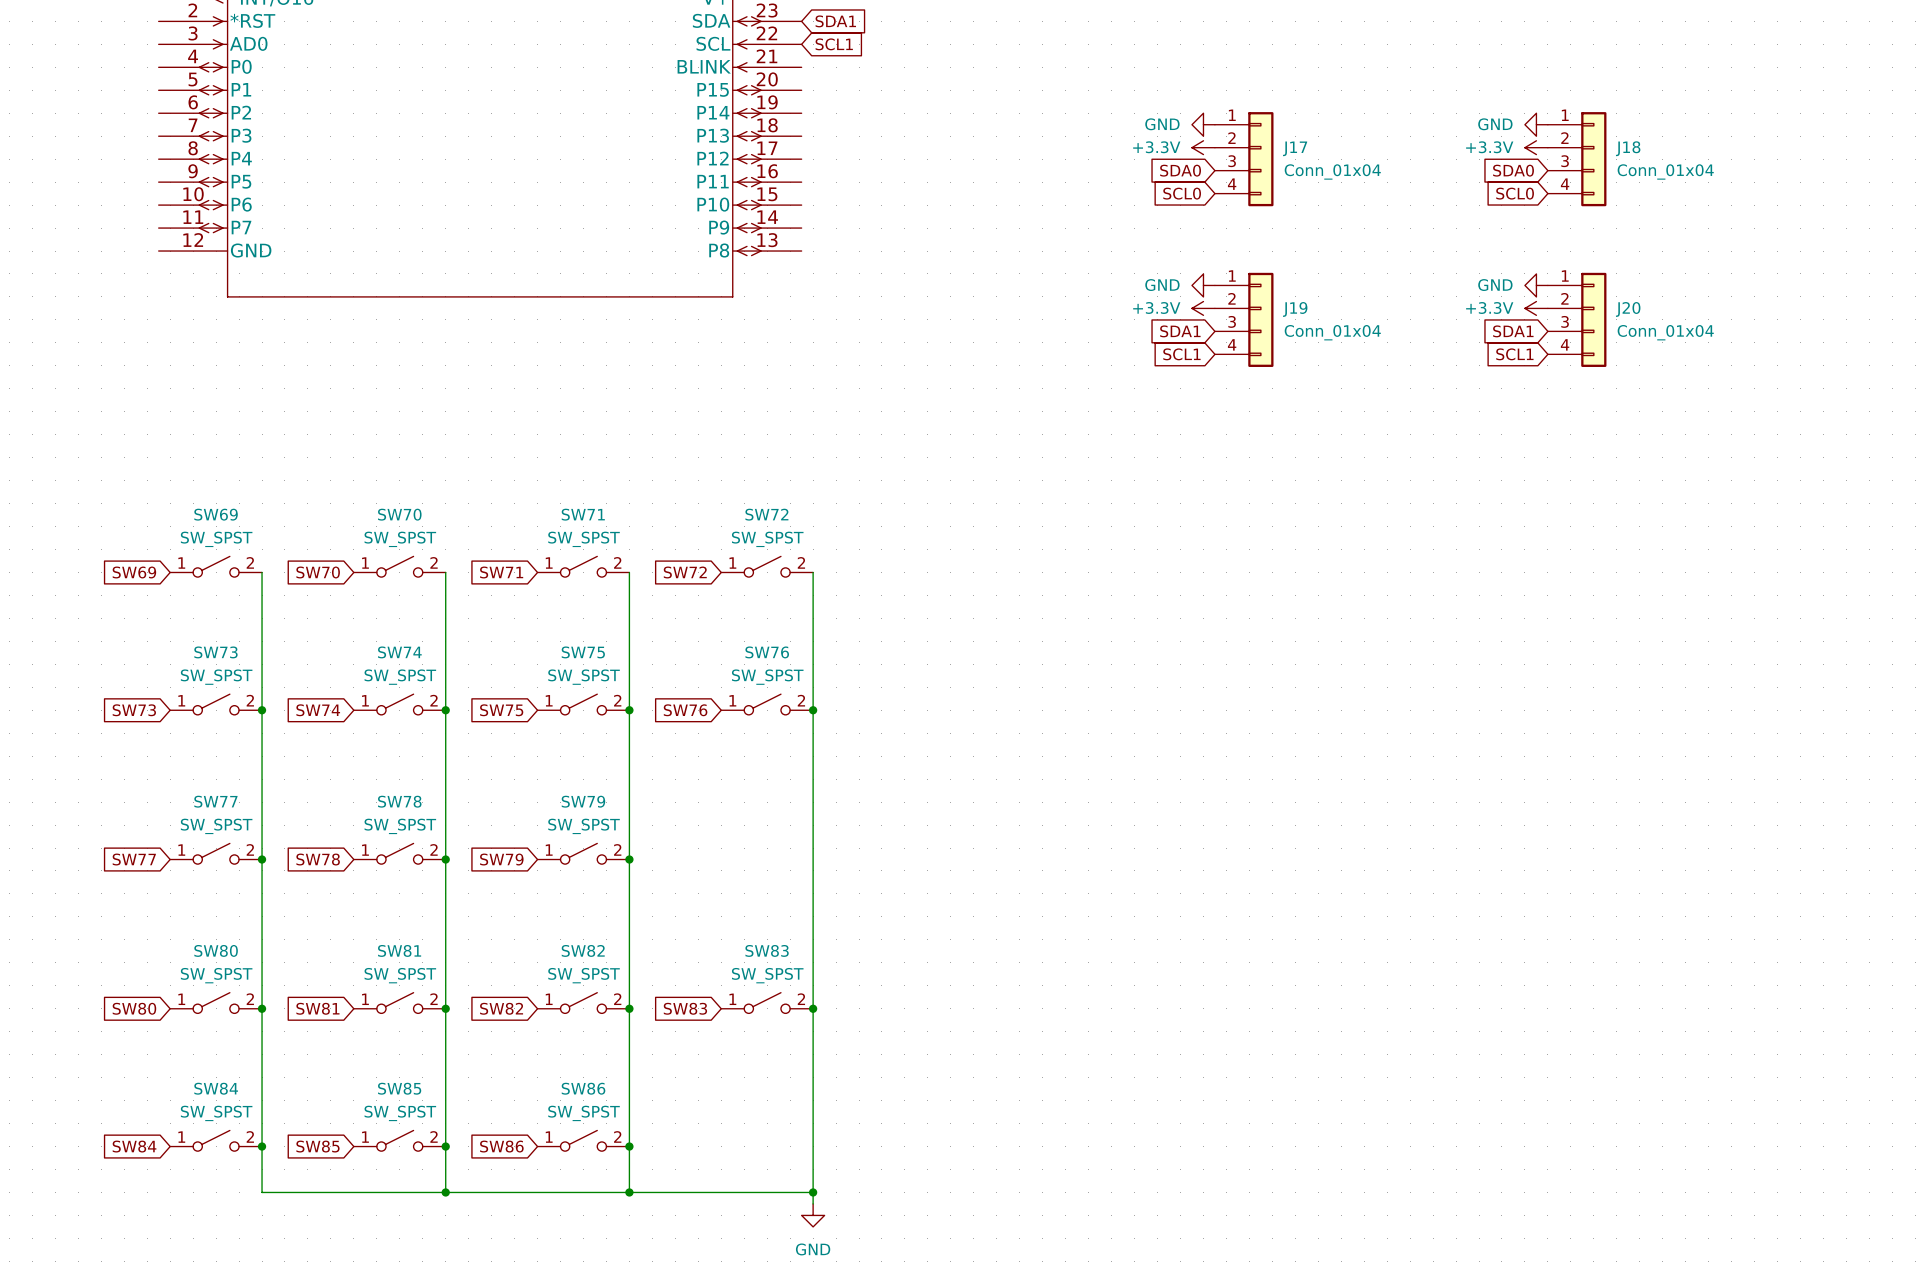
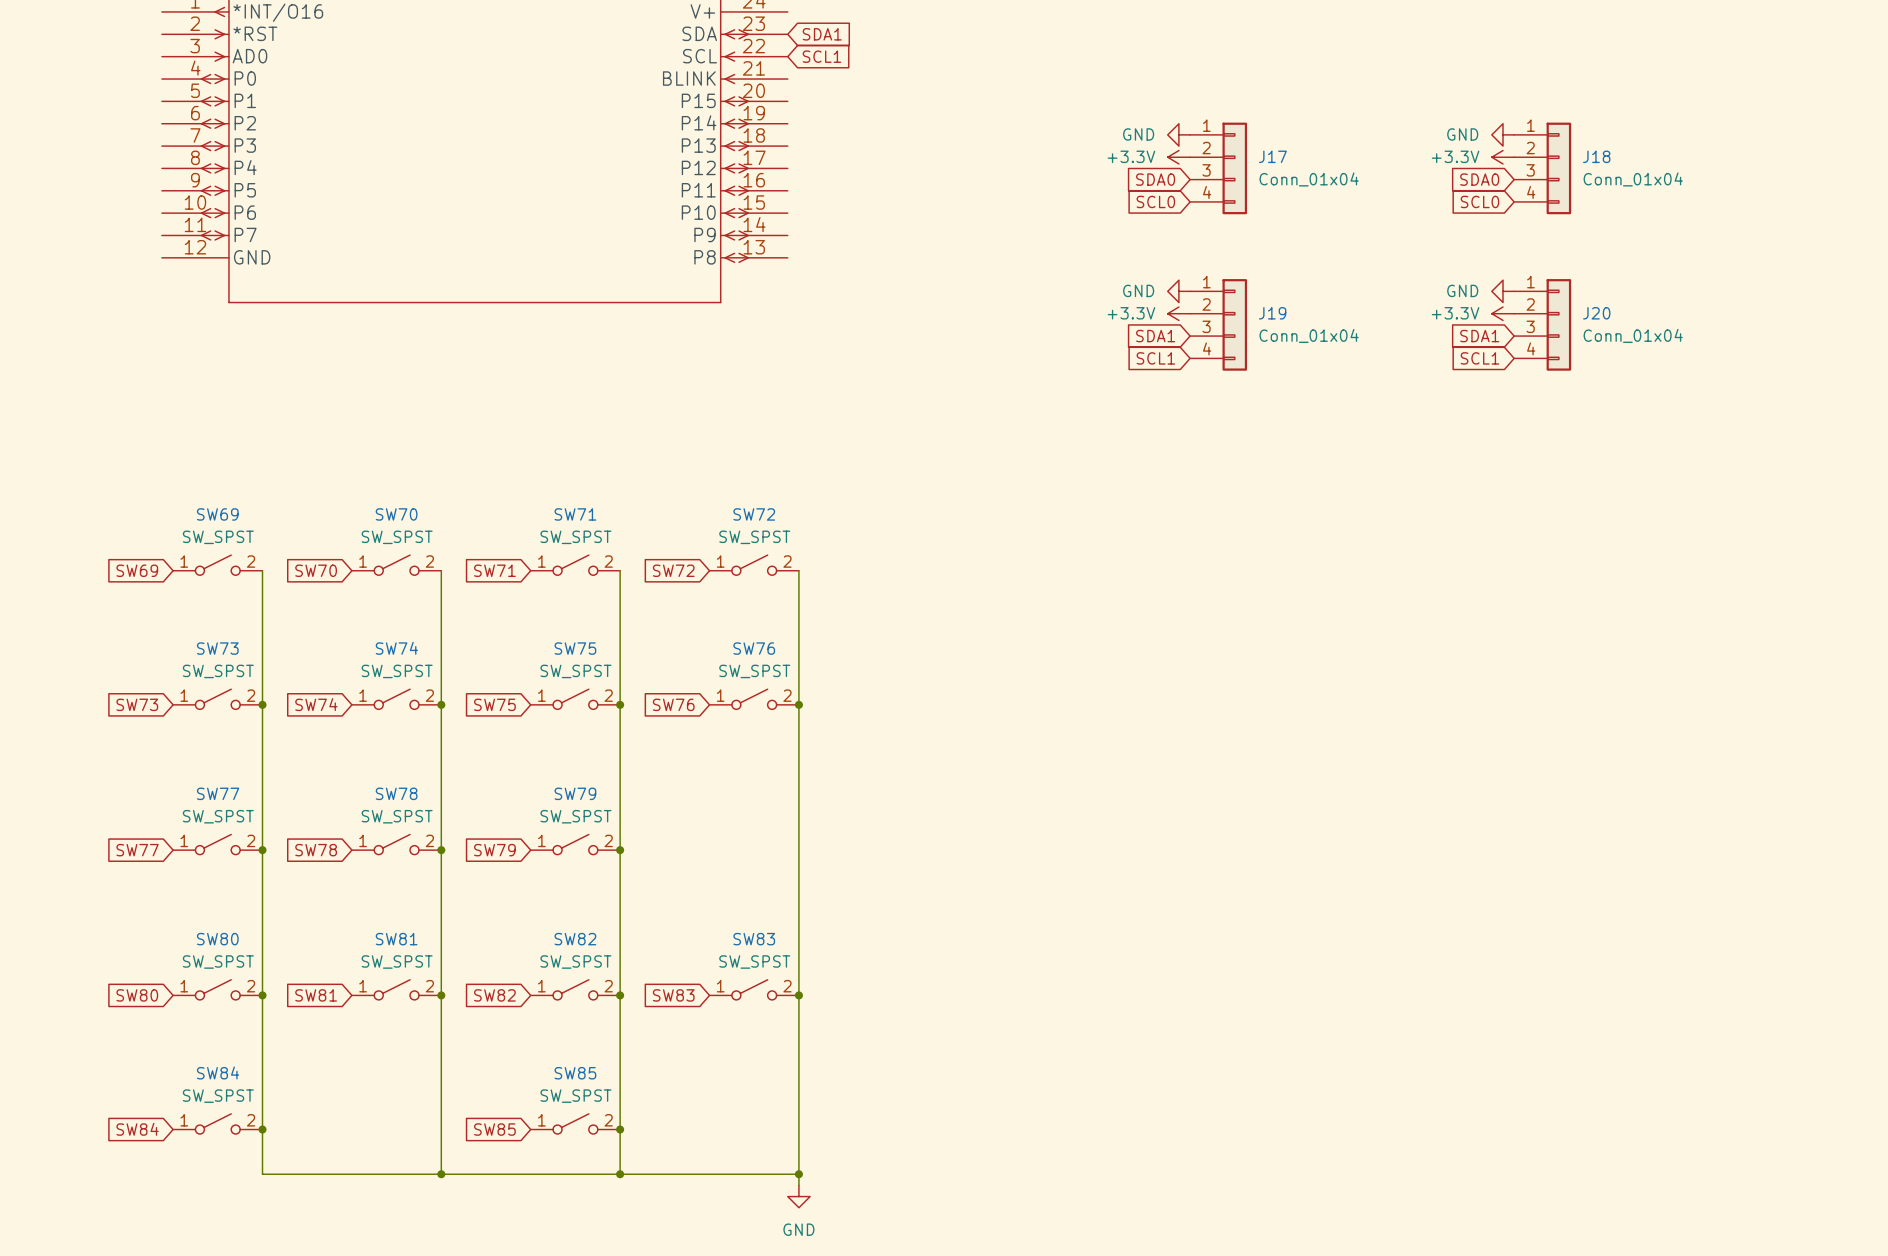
SW86 name: SW86 (583, 1088) -> SW85 (575, 1073)
SW85: SW_SPST (399, 1140) -> none
global label: SW85 (317, 1146) -> none
junction: (445, 1146) -> none
global label: SW86 (501, 1146) -> SW85 (494, 1129)

